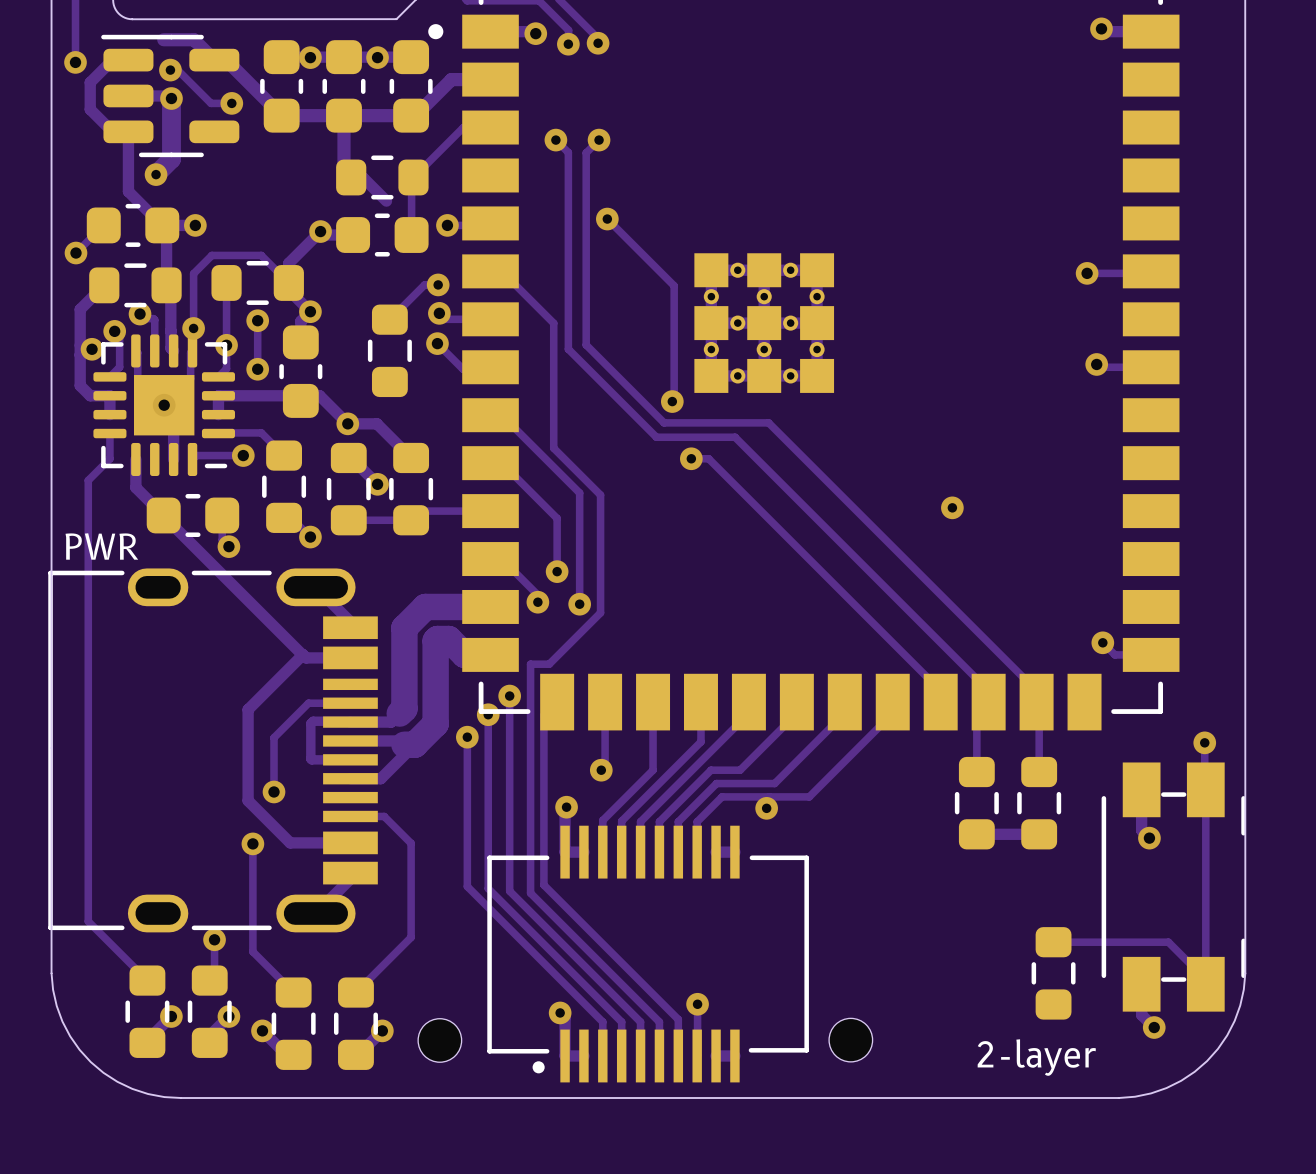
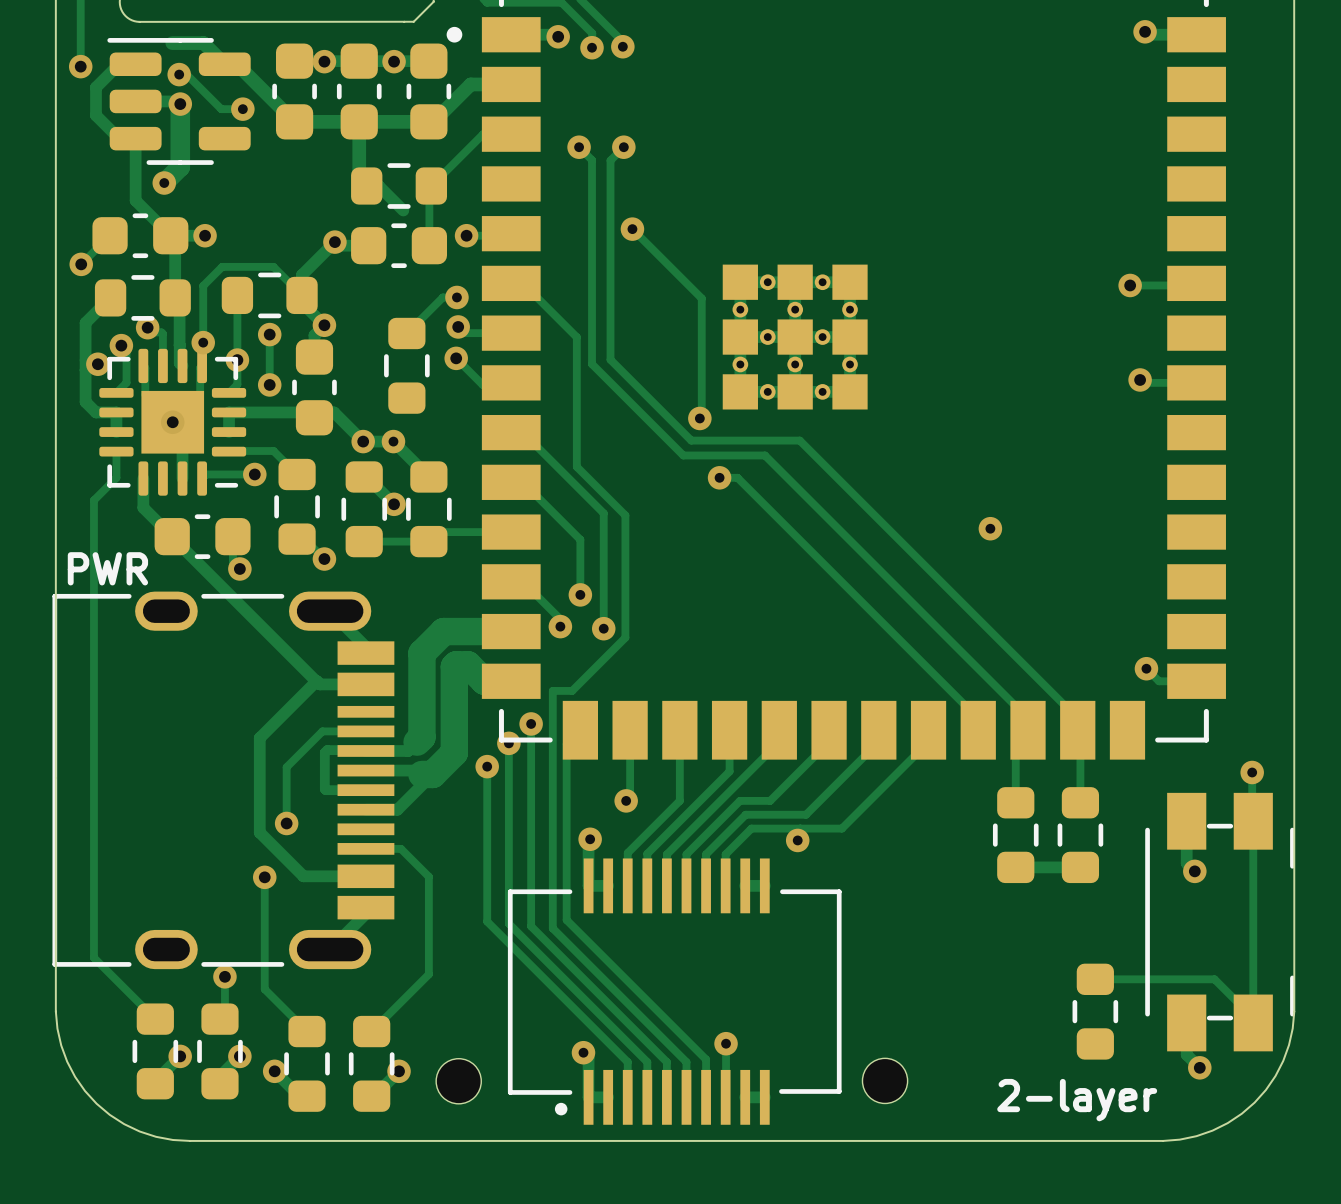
via: none -> (393, 441)

